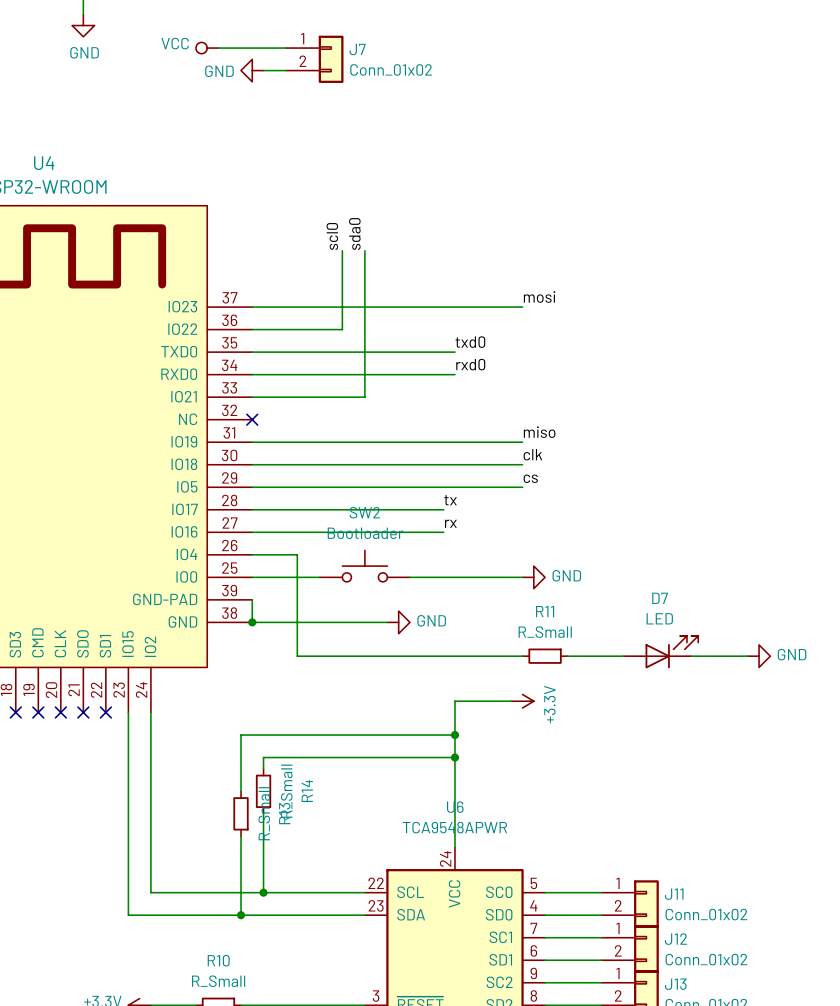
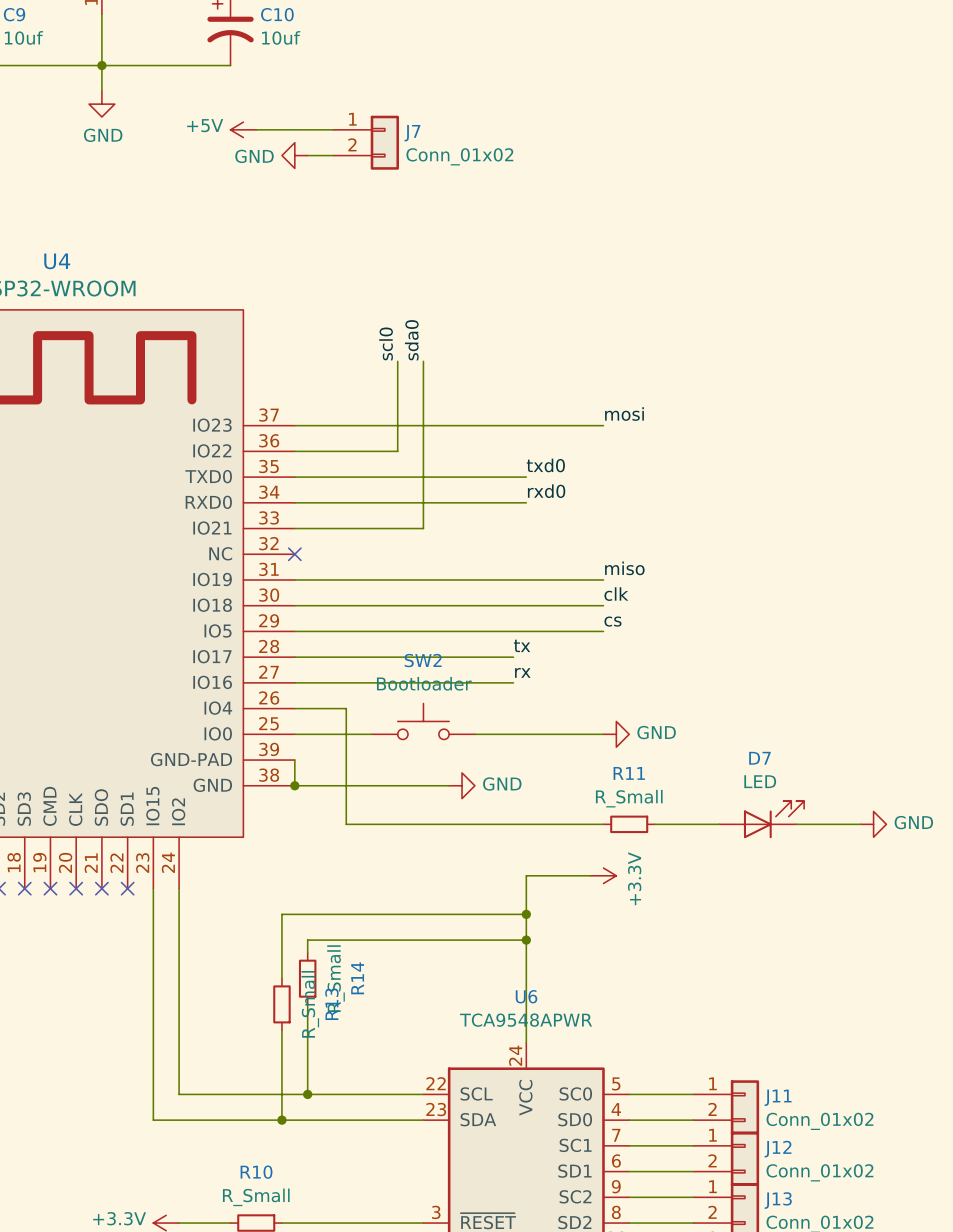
power symbol: VCC (207, 48) -> +5V (243, 129)

